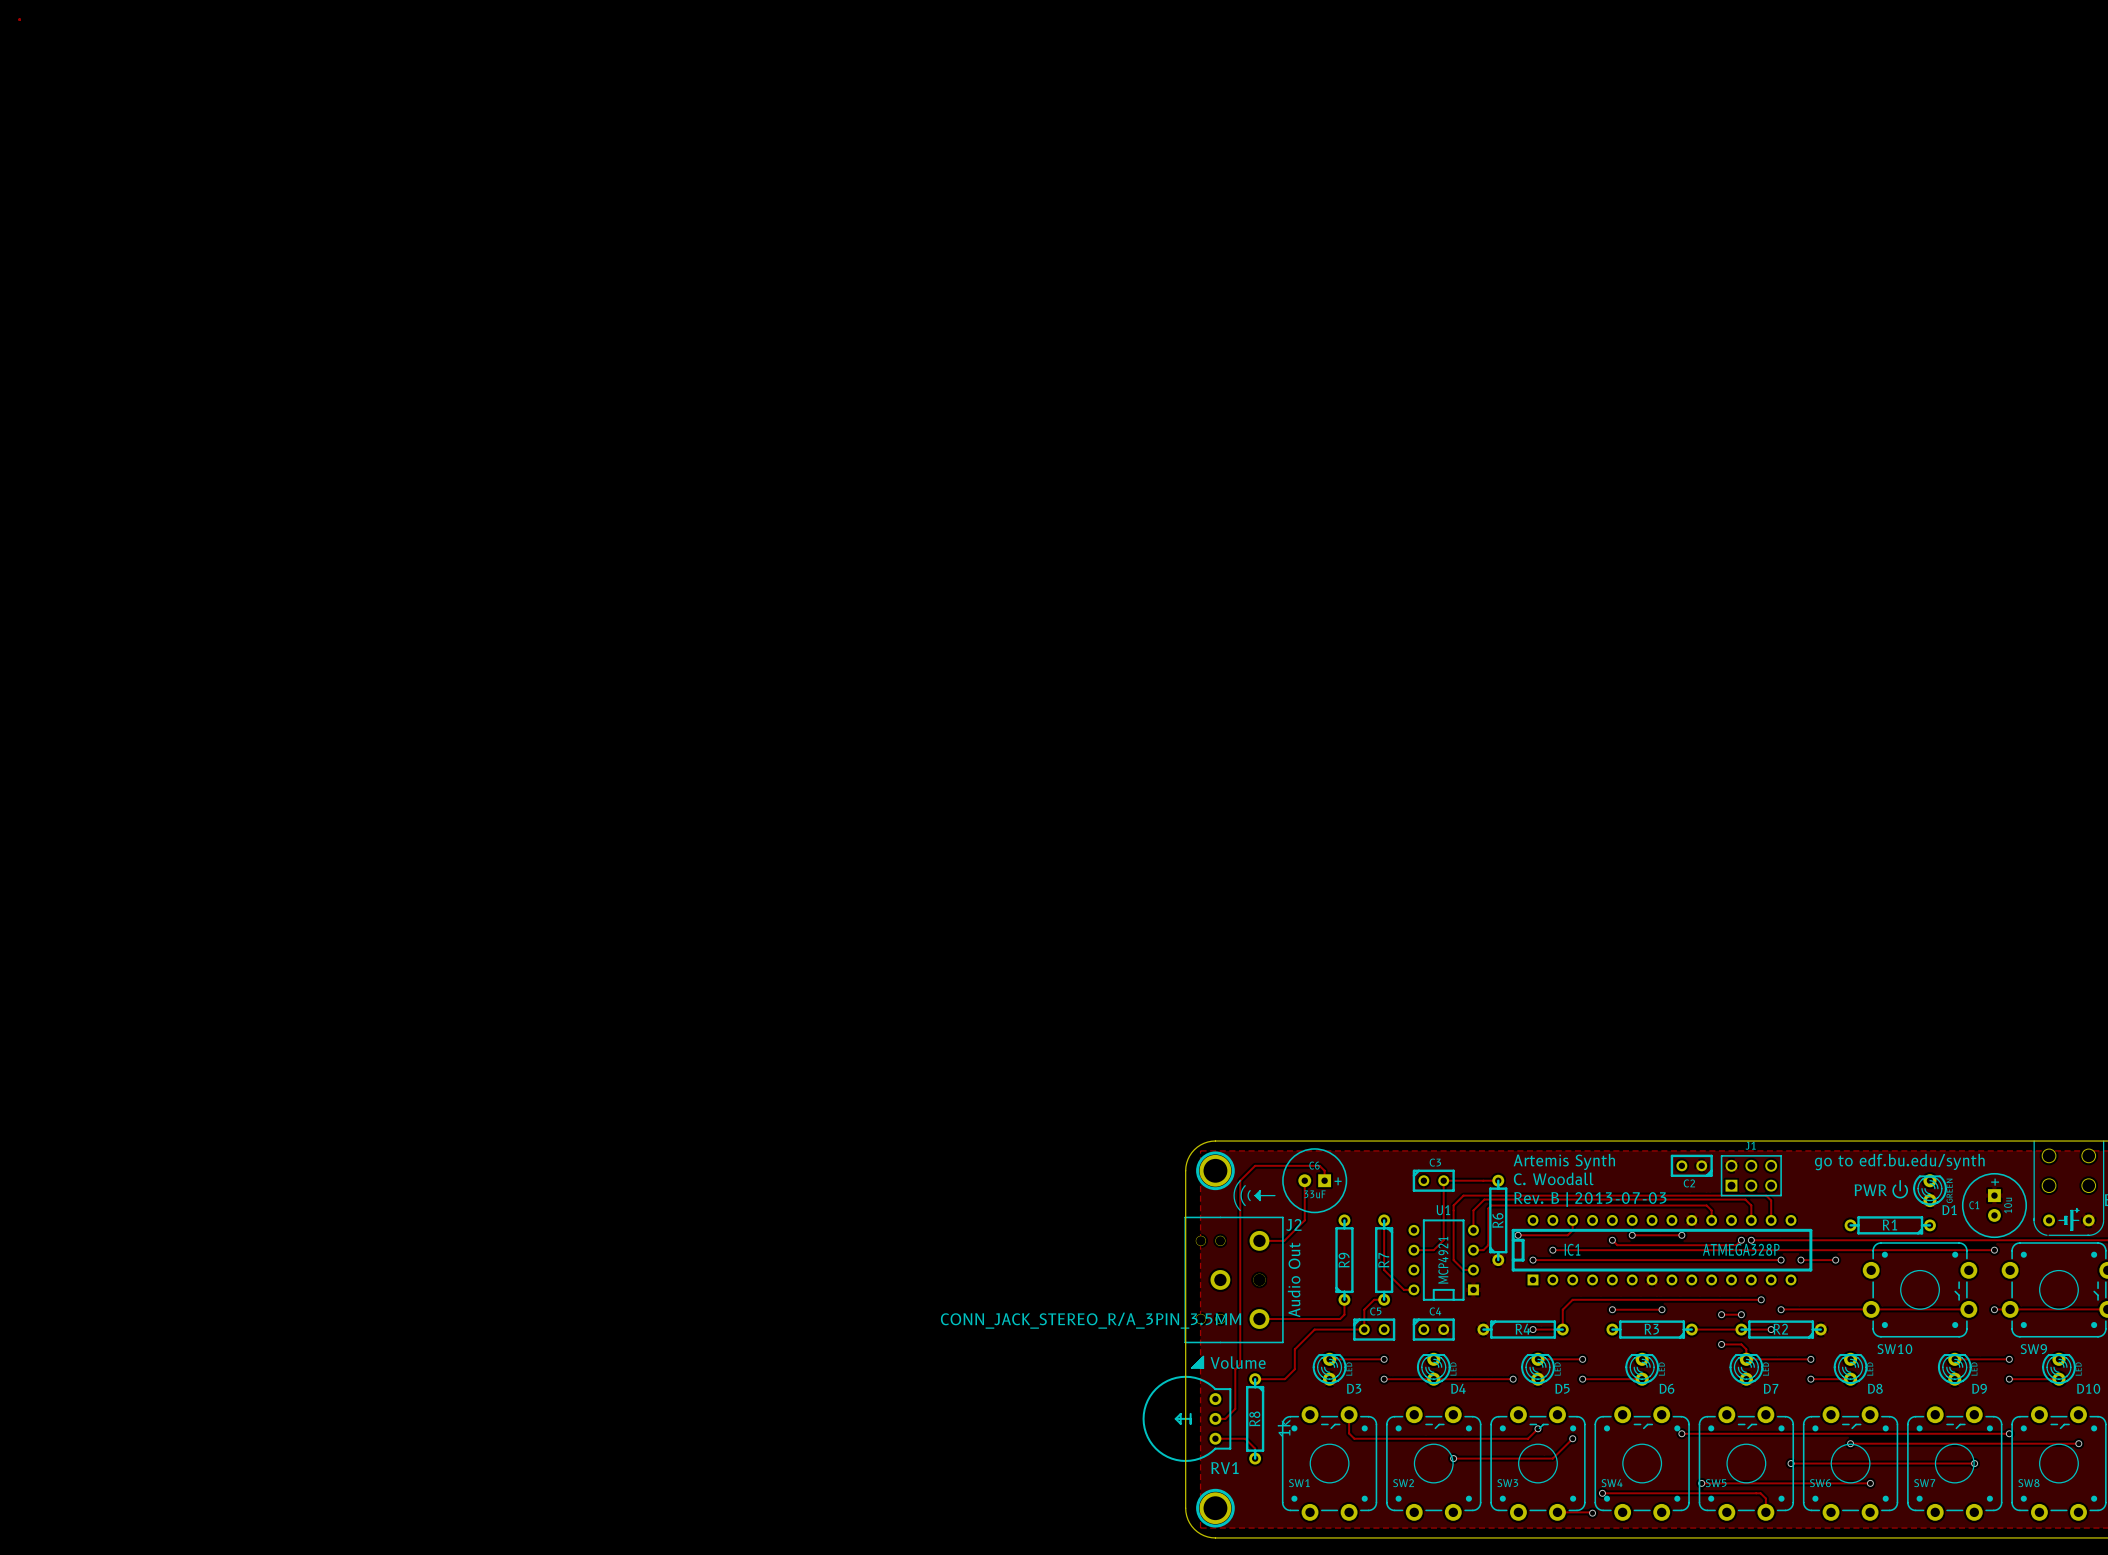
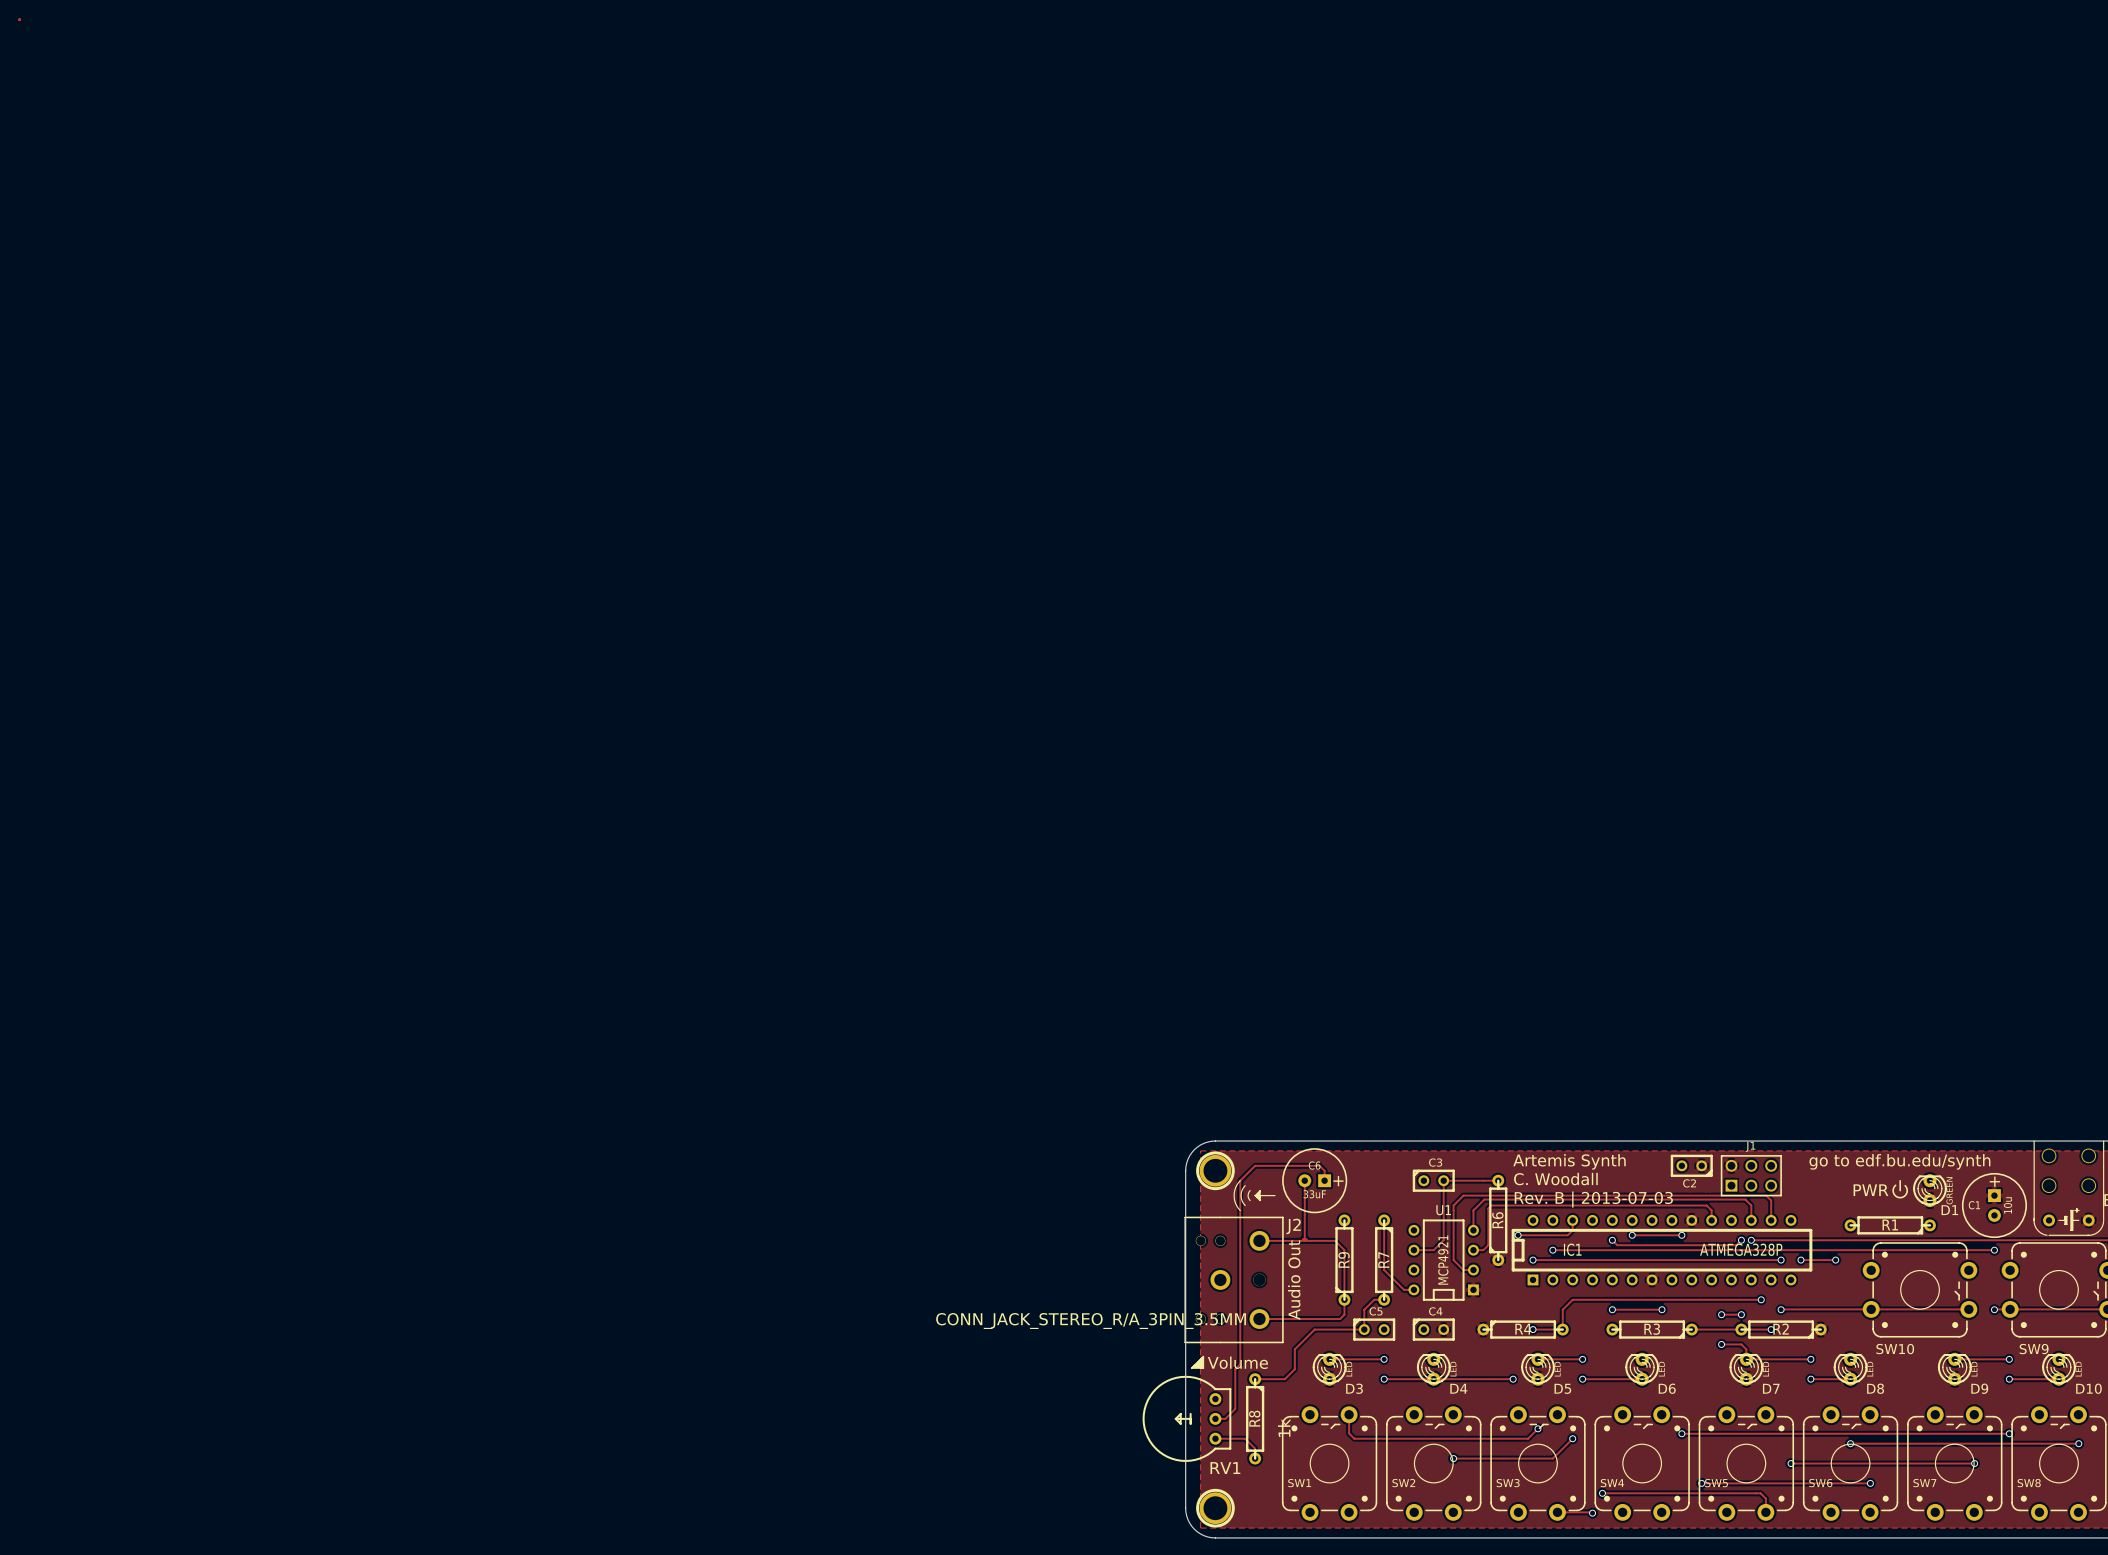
track: (1304, 1220) (1284, 1240) -> (1304, 1220) (1304, 1240)
track: none -> (1302, 1239) (1306, 1239)
track: none -> (1284, 1240) (1335, 1240) (1344, 1250) (1344, 1299)

